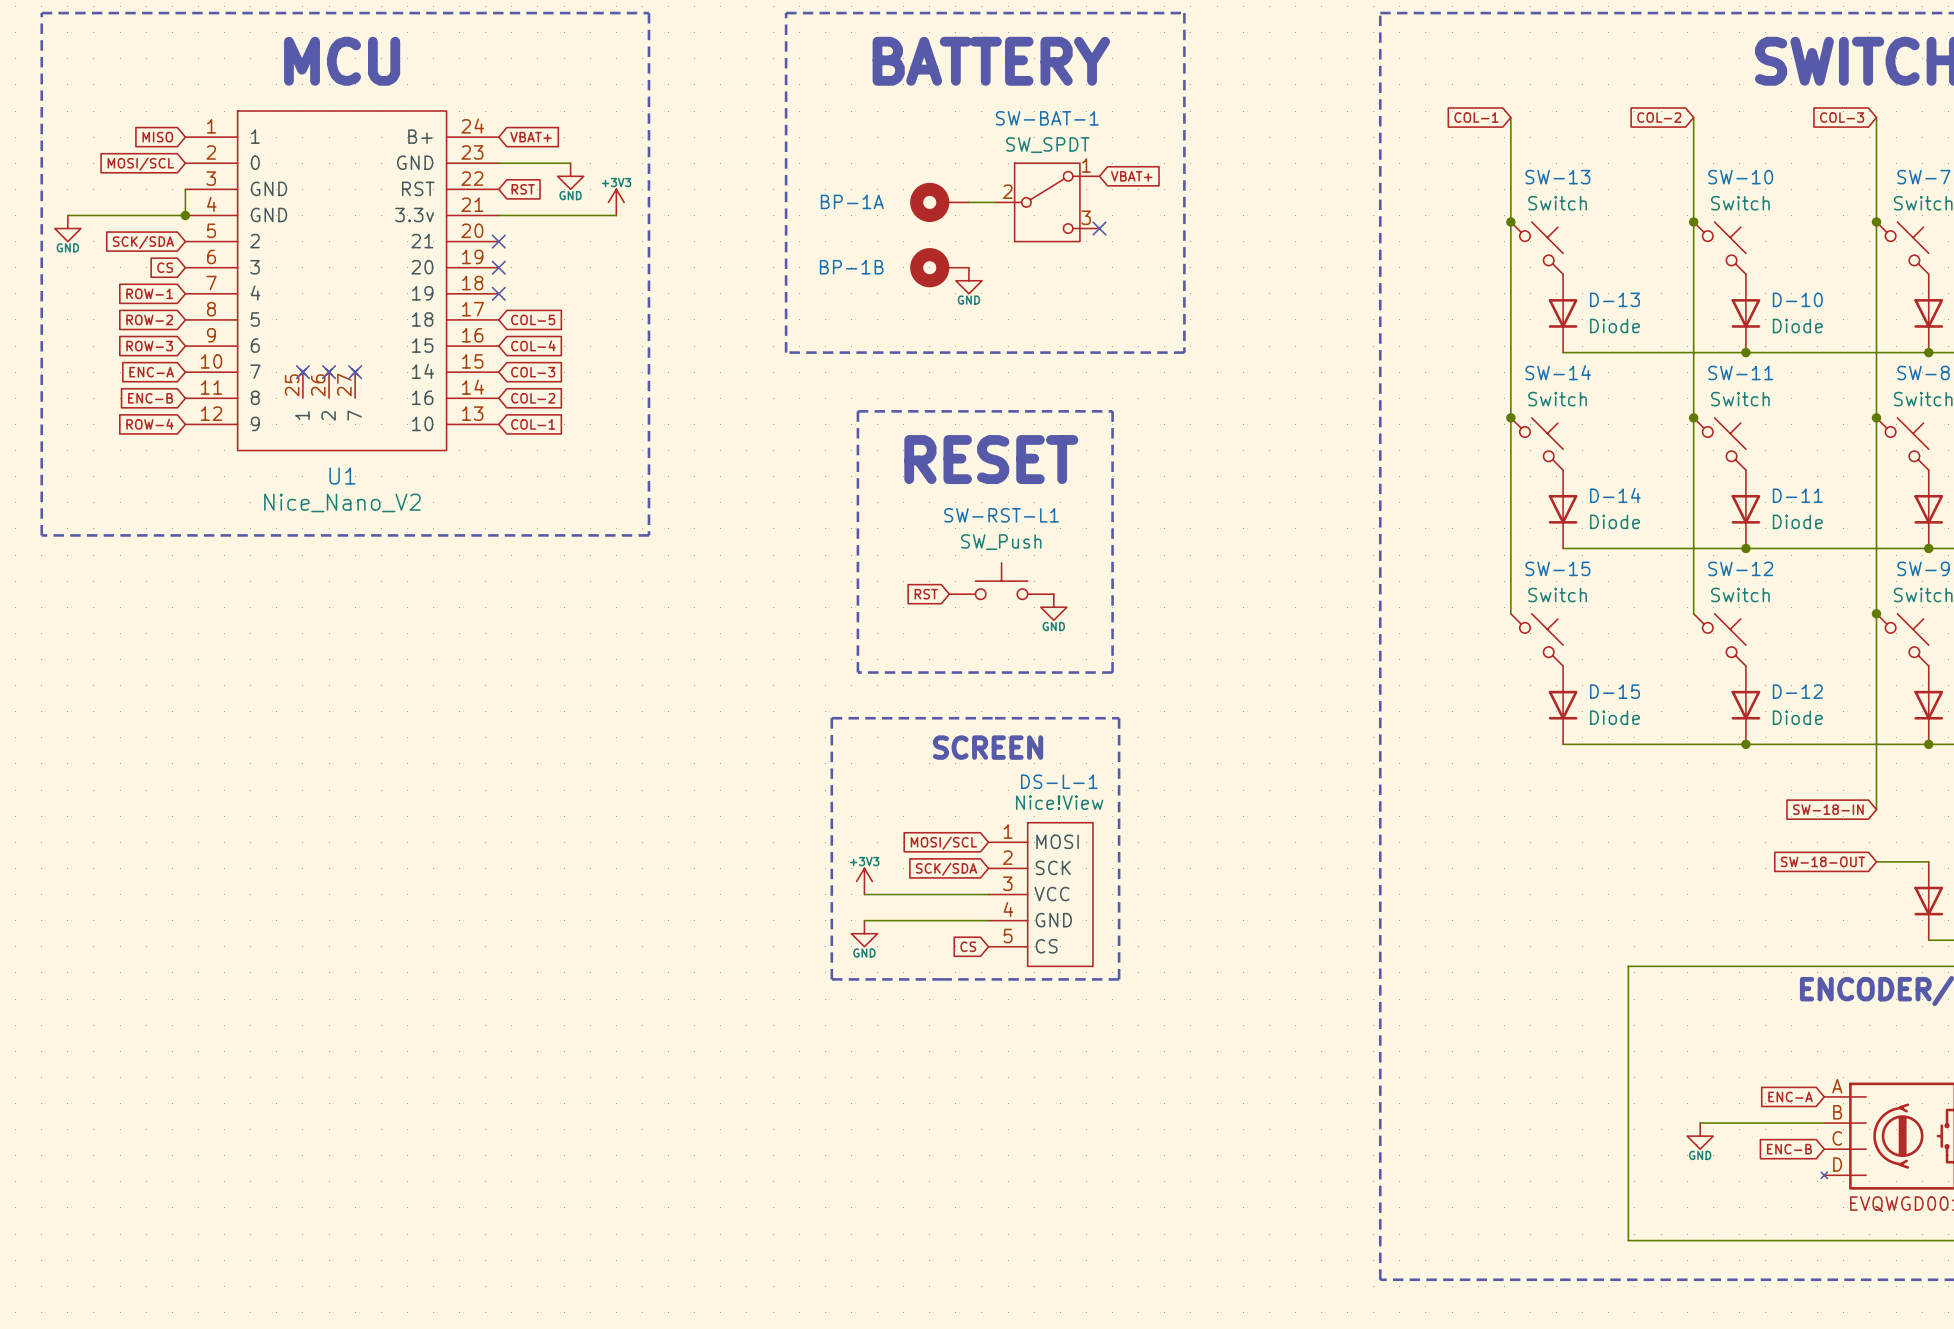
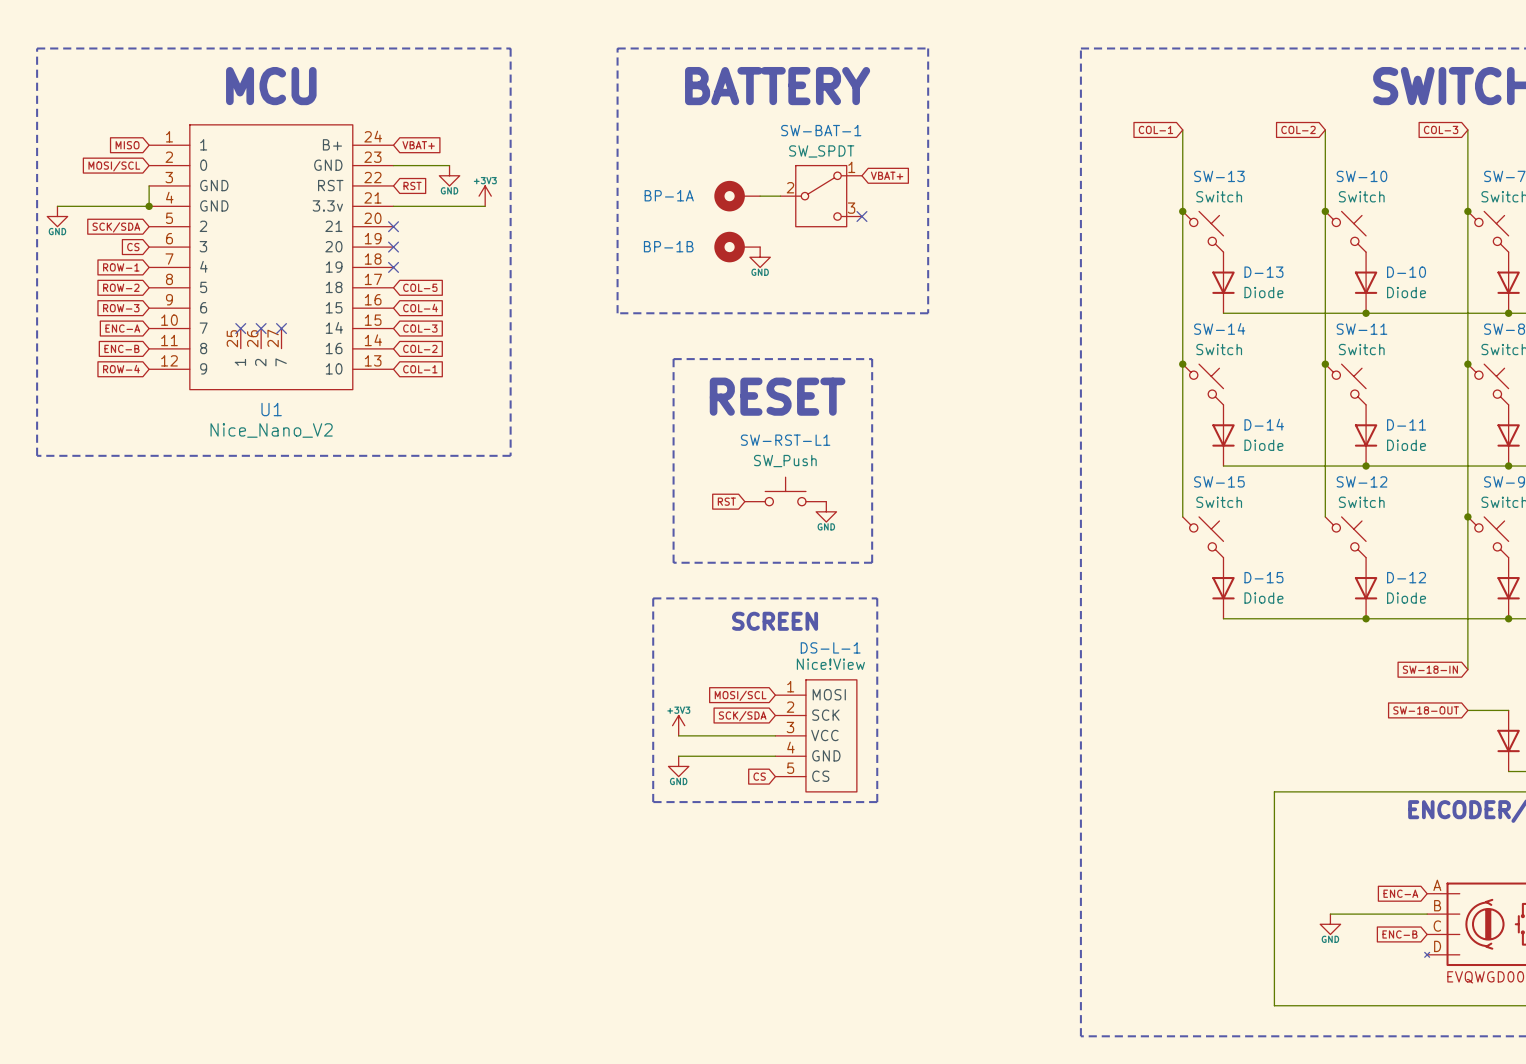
U1 symbol: [185, 111, 499, 451] -> [149, 124, 394, 390]

